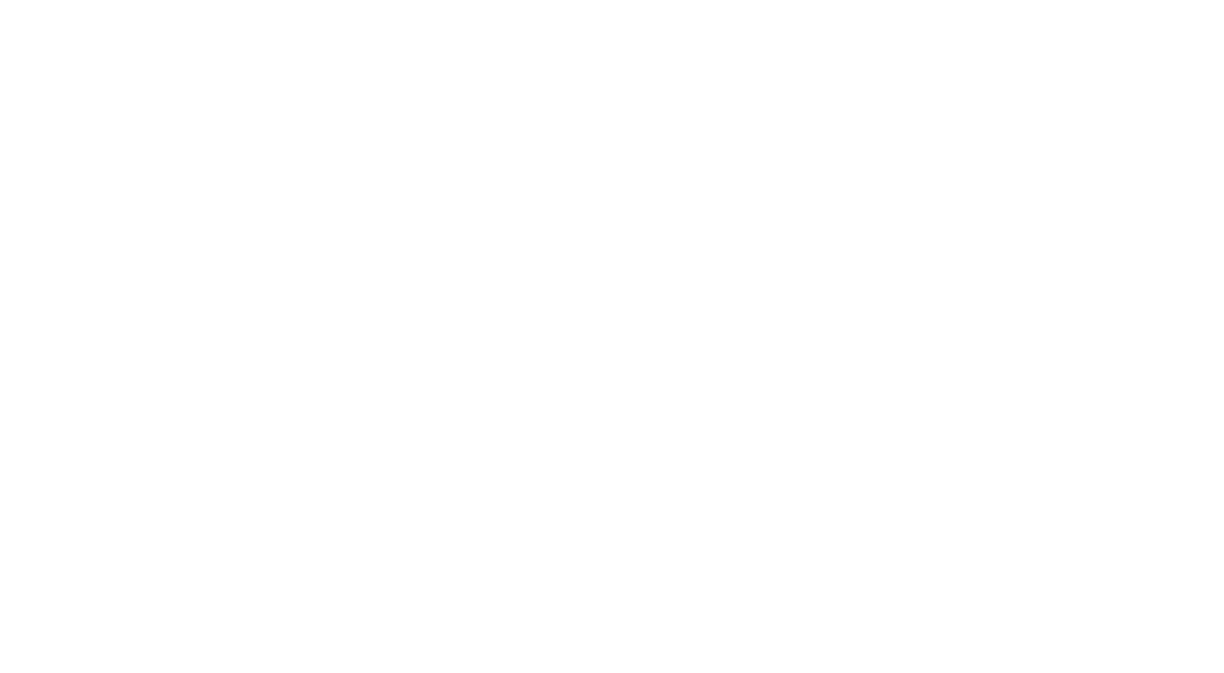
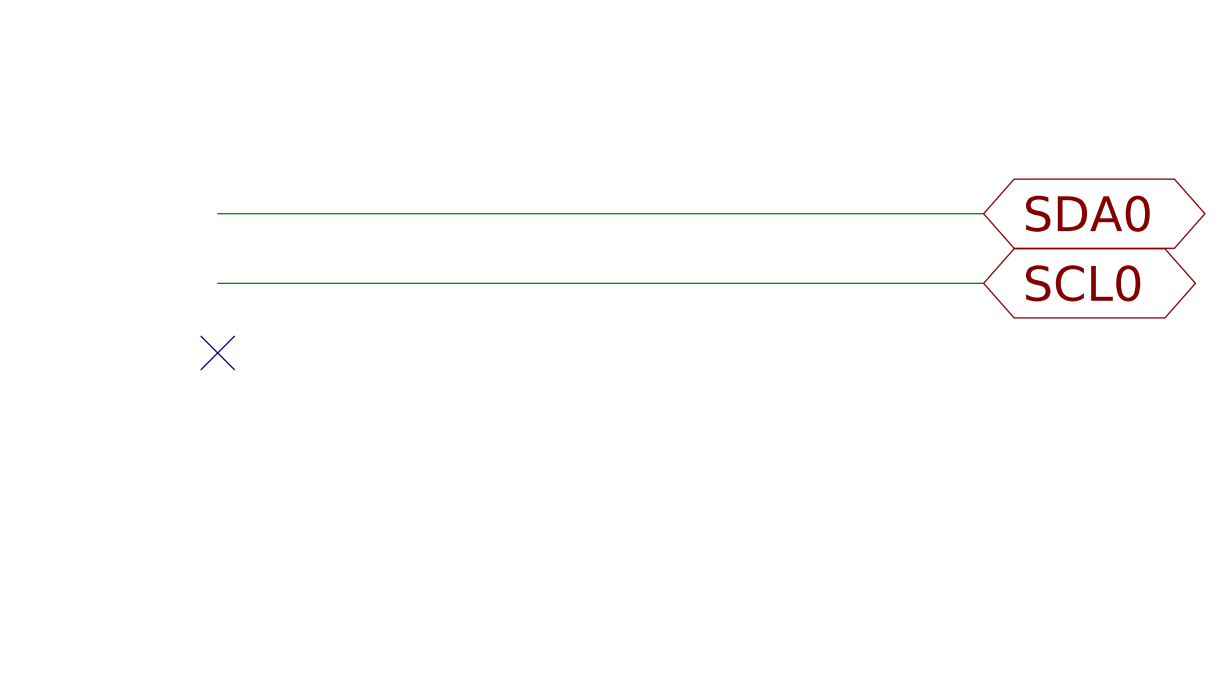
wire: none -> (217, 213) (983, 213)
global label: none -> SDA0 (1087, 213)
wire: none -> (217, 283) (983, 283)
global label: none -> SCL0 (1083, 283)
no-connect mark: none -> (217, 352)

